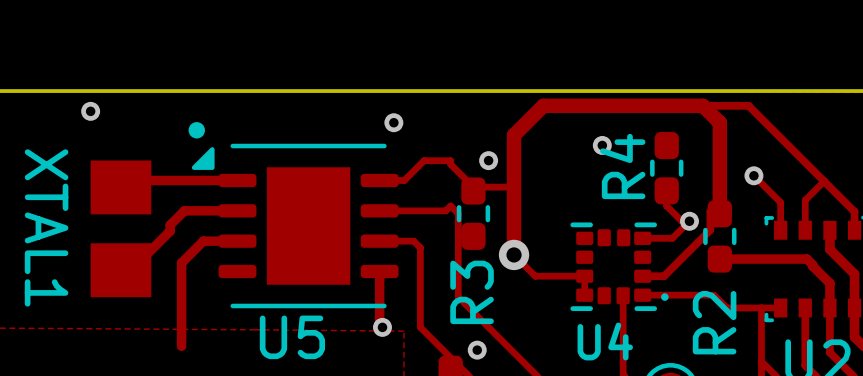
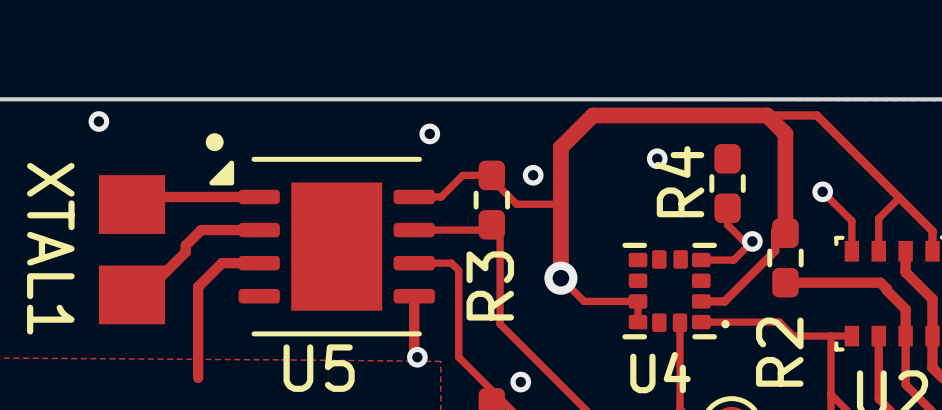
R3 position: (473, 213) -> (491, 200)

